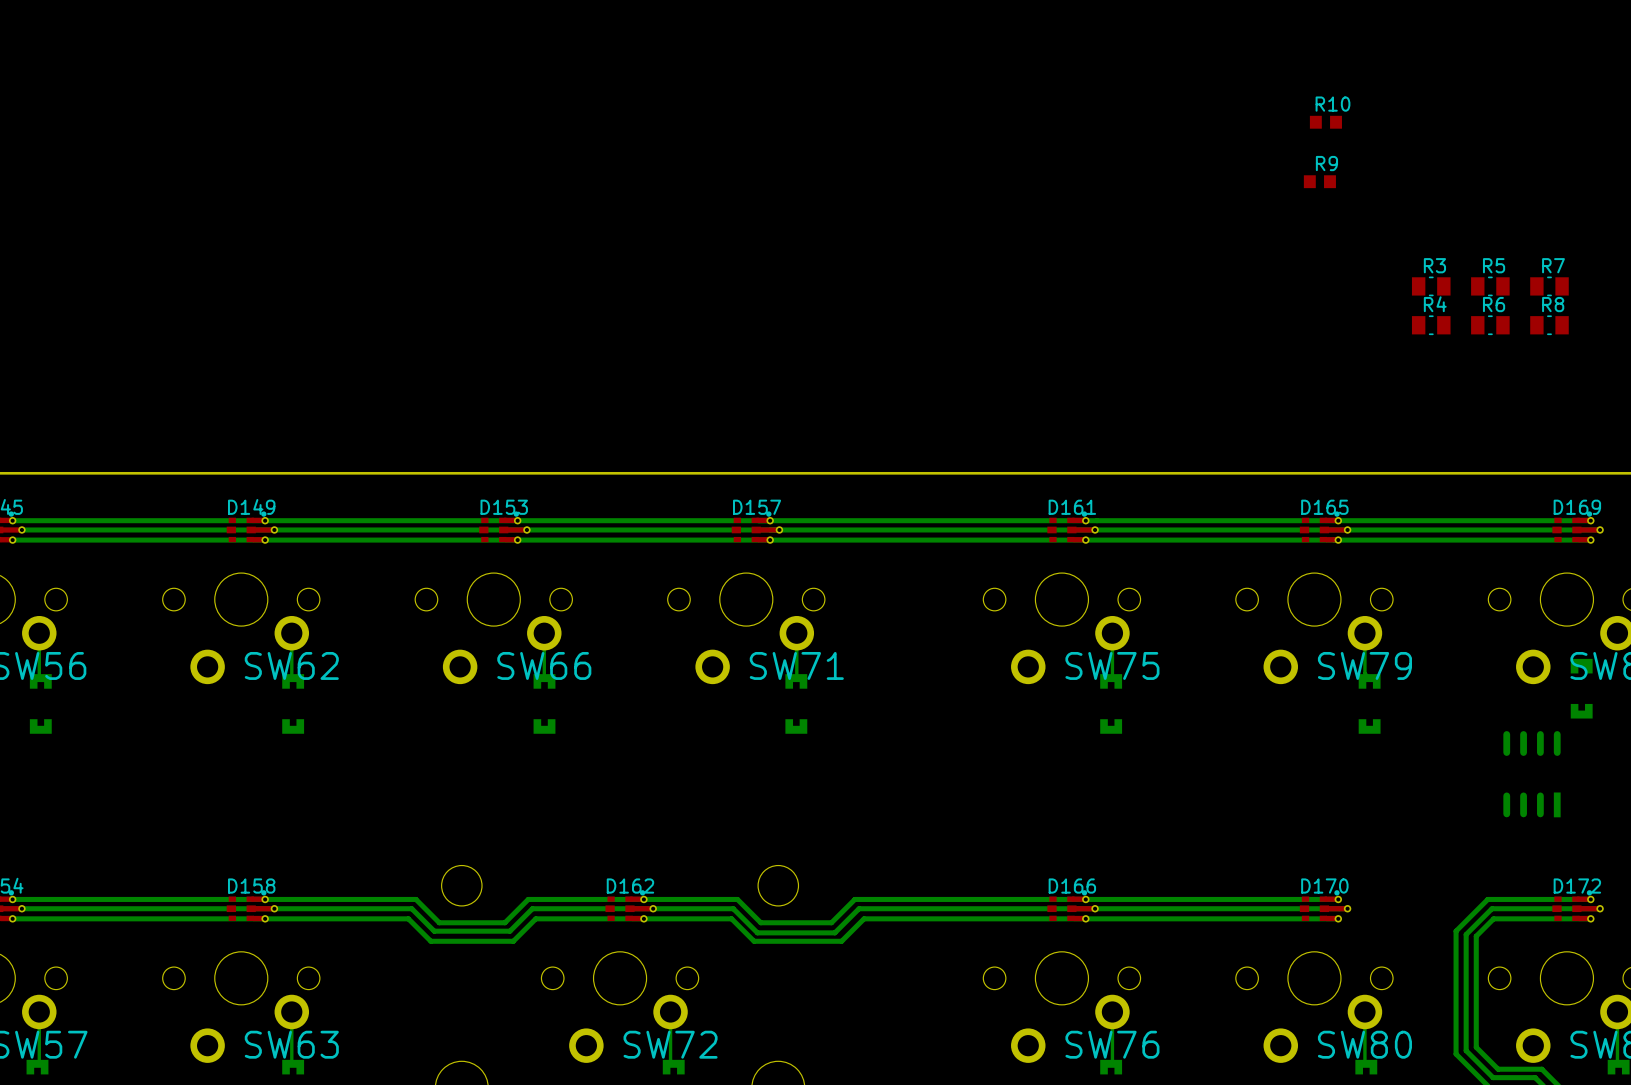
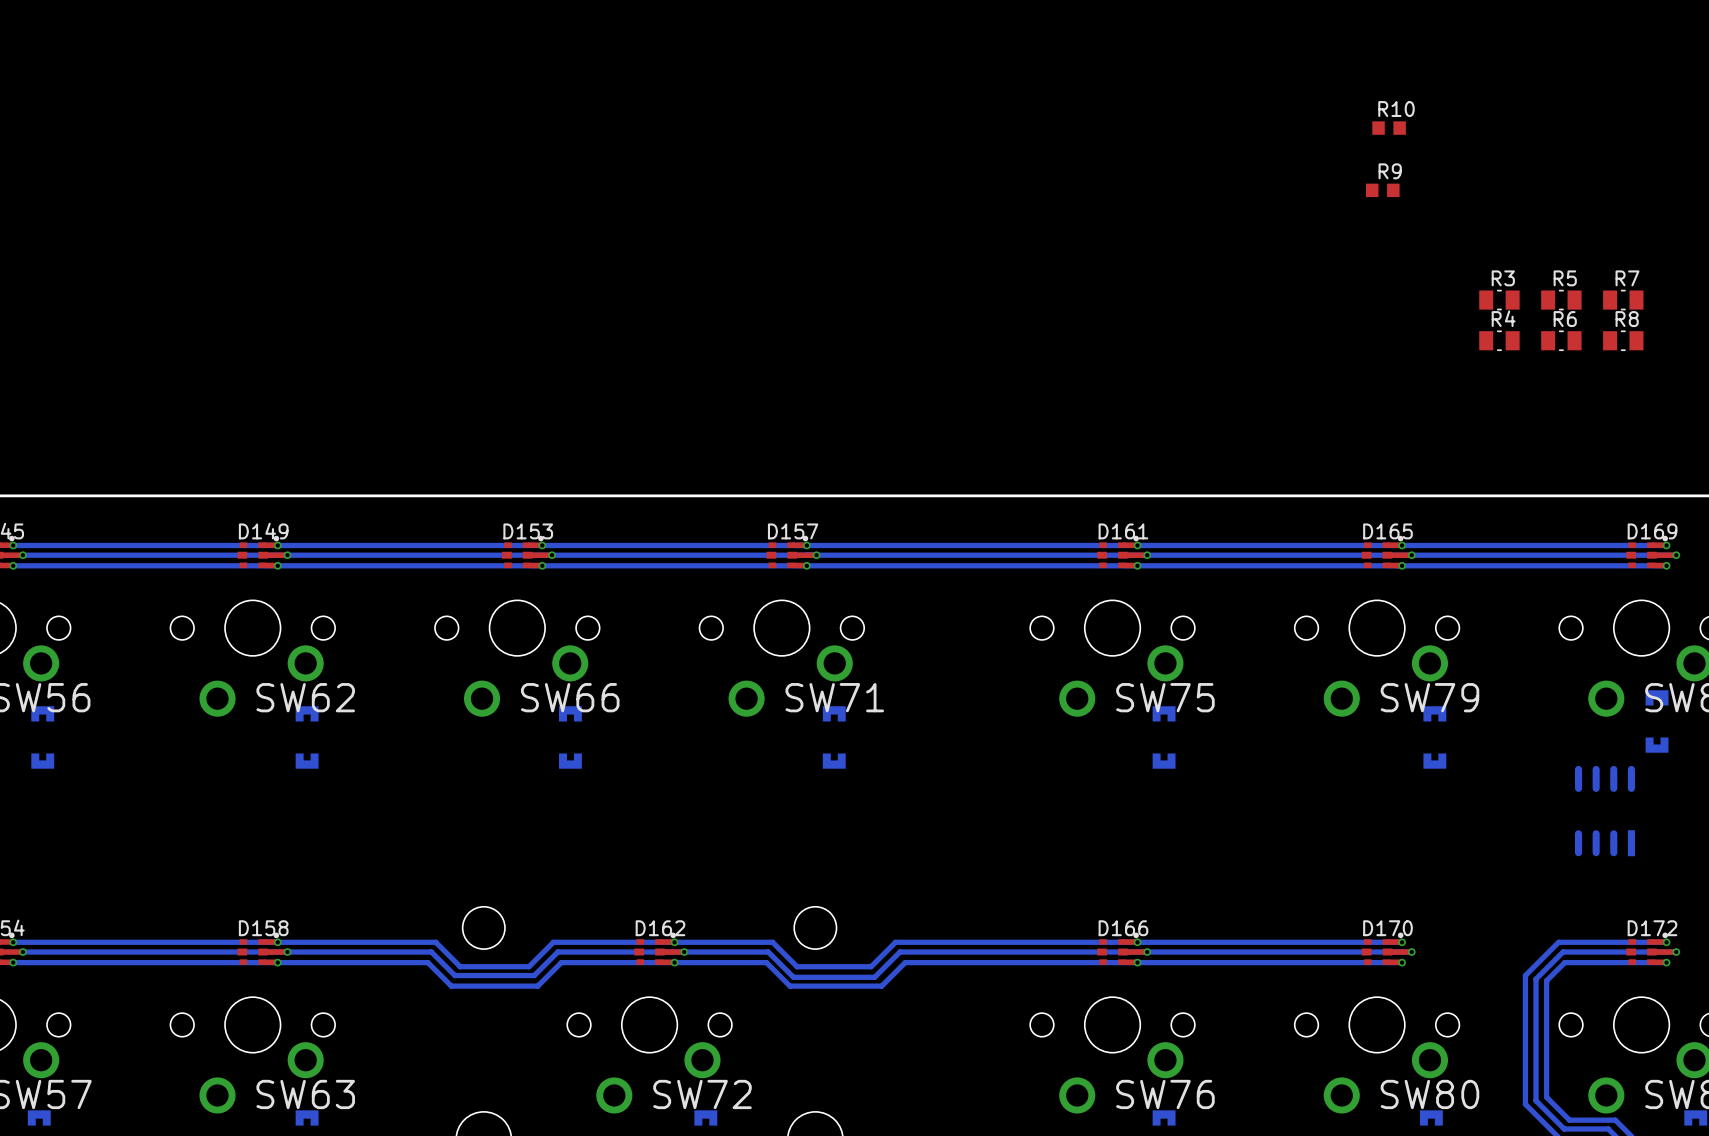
bottom track: (39, 633) (40, 678) -> none
bottom track: (291, 633) (293, 678) -> none
bottom track: (544, 633) (544, 678) -> none
bottom track: (796, 633) (796, 678) -> none
bottom track: (1112, 633) (1111, 678) -> none
bottom track: (1364, 633) (1364, 673) (1369, 678) -> none
bottom track: (39, 1011) (39, 1062) (37, 1063) -> none
bottom track: (291, 1011) (293, 1063) -> none
bottom track: (670, 1011) (670, 1060) (673, 1063) -> none
bottom track: (1112, 1011) (1111, 1063) -> none
bottom track: (1364, 1011) (1366, 1063) -> none
bottom track: (1617, 1011) (1618, 1063) -> none

